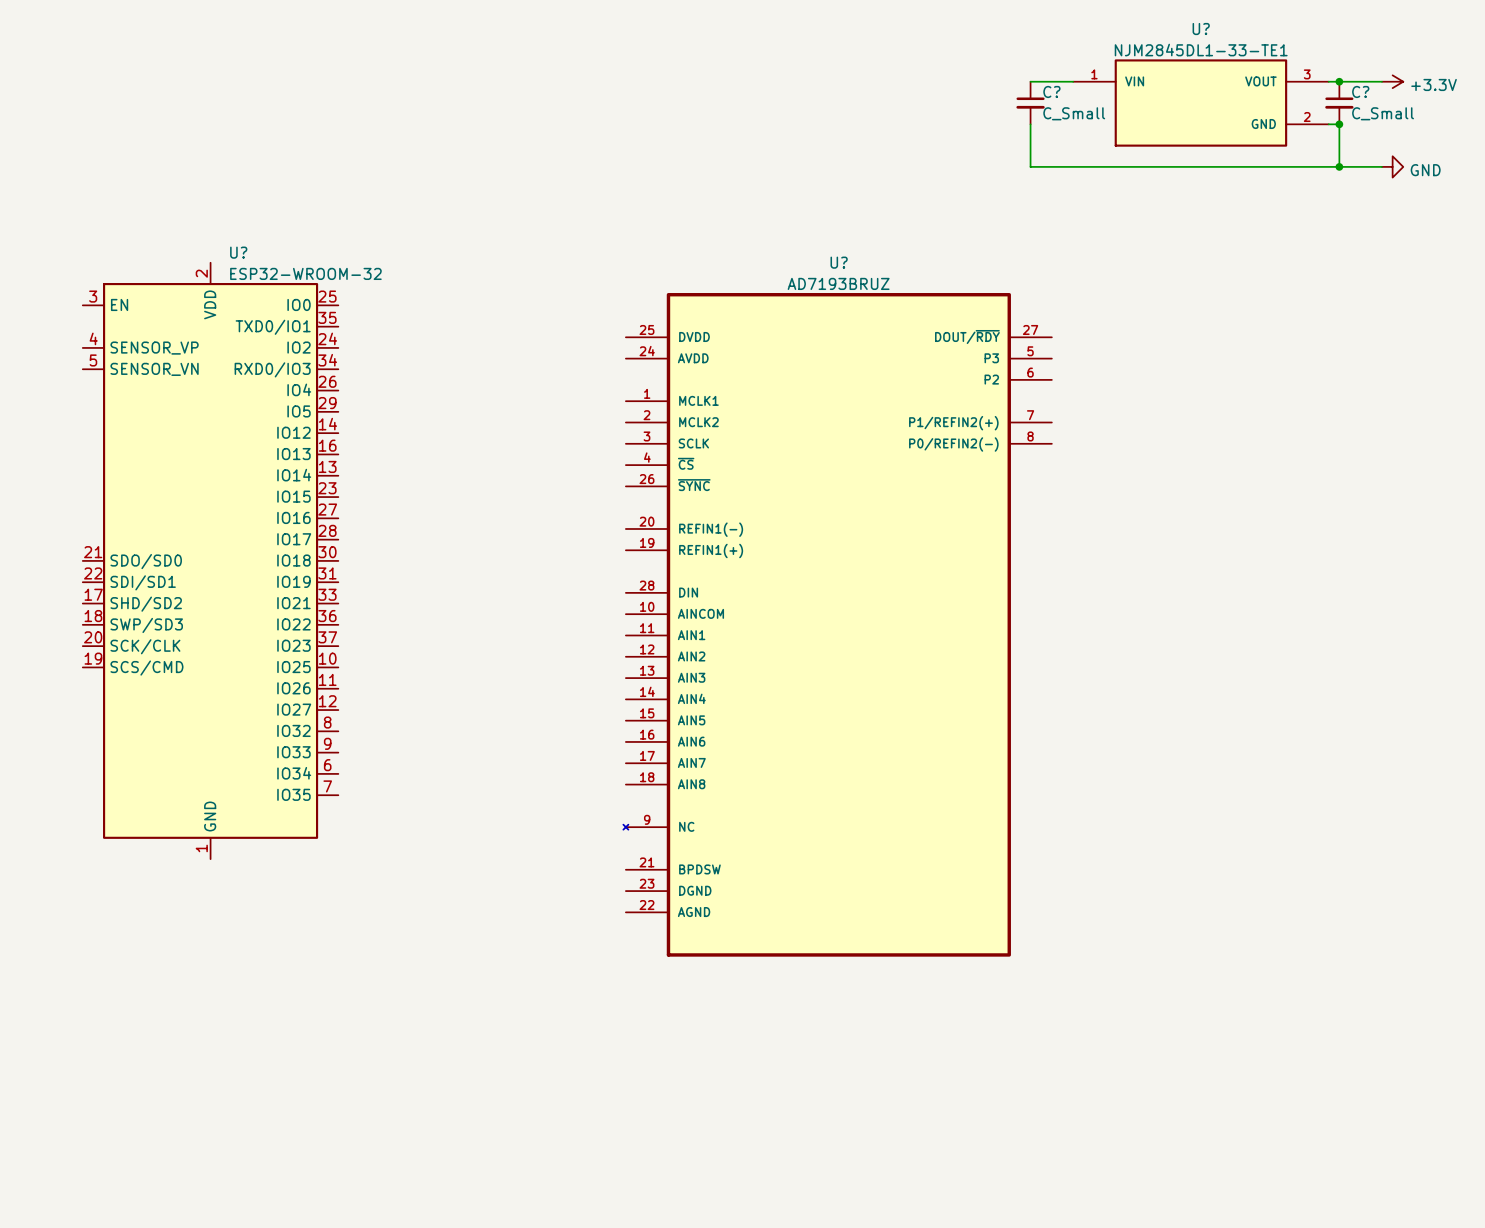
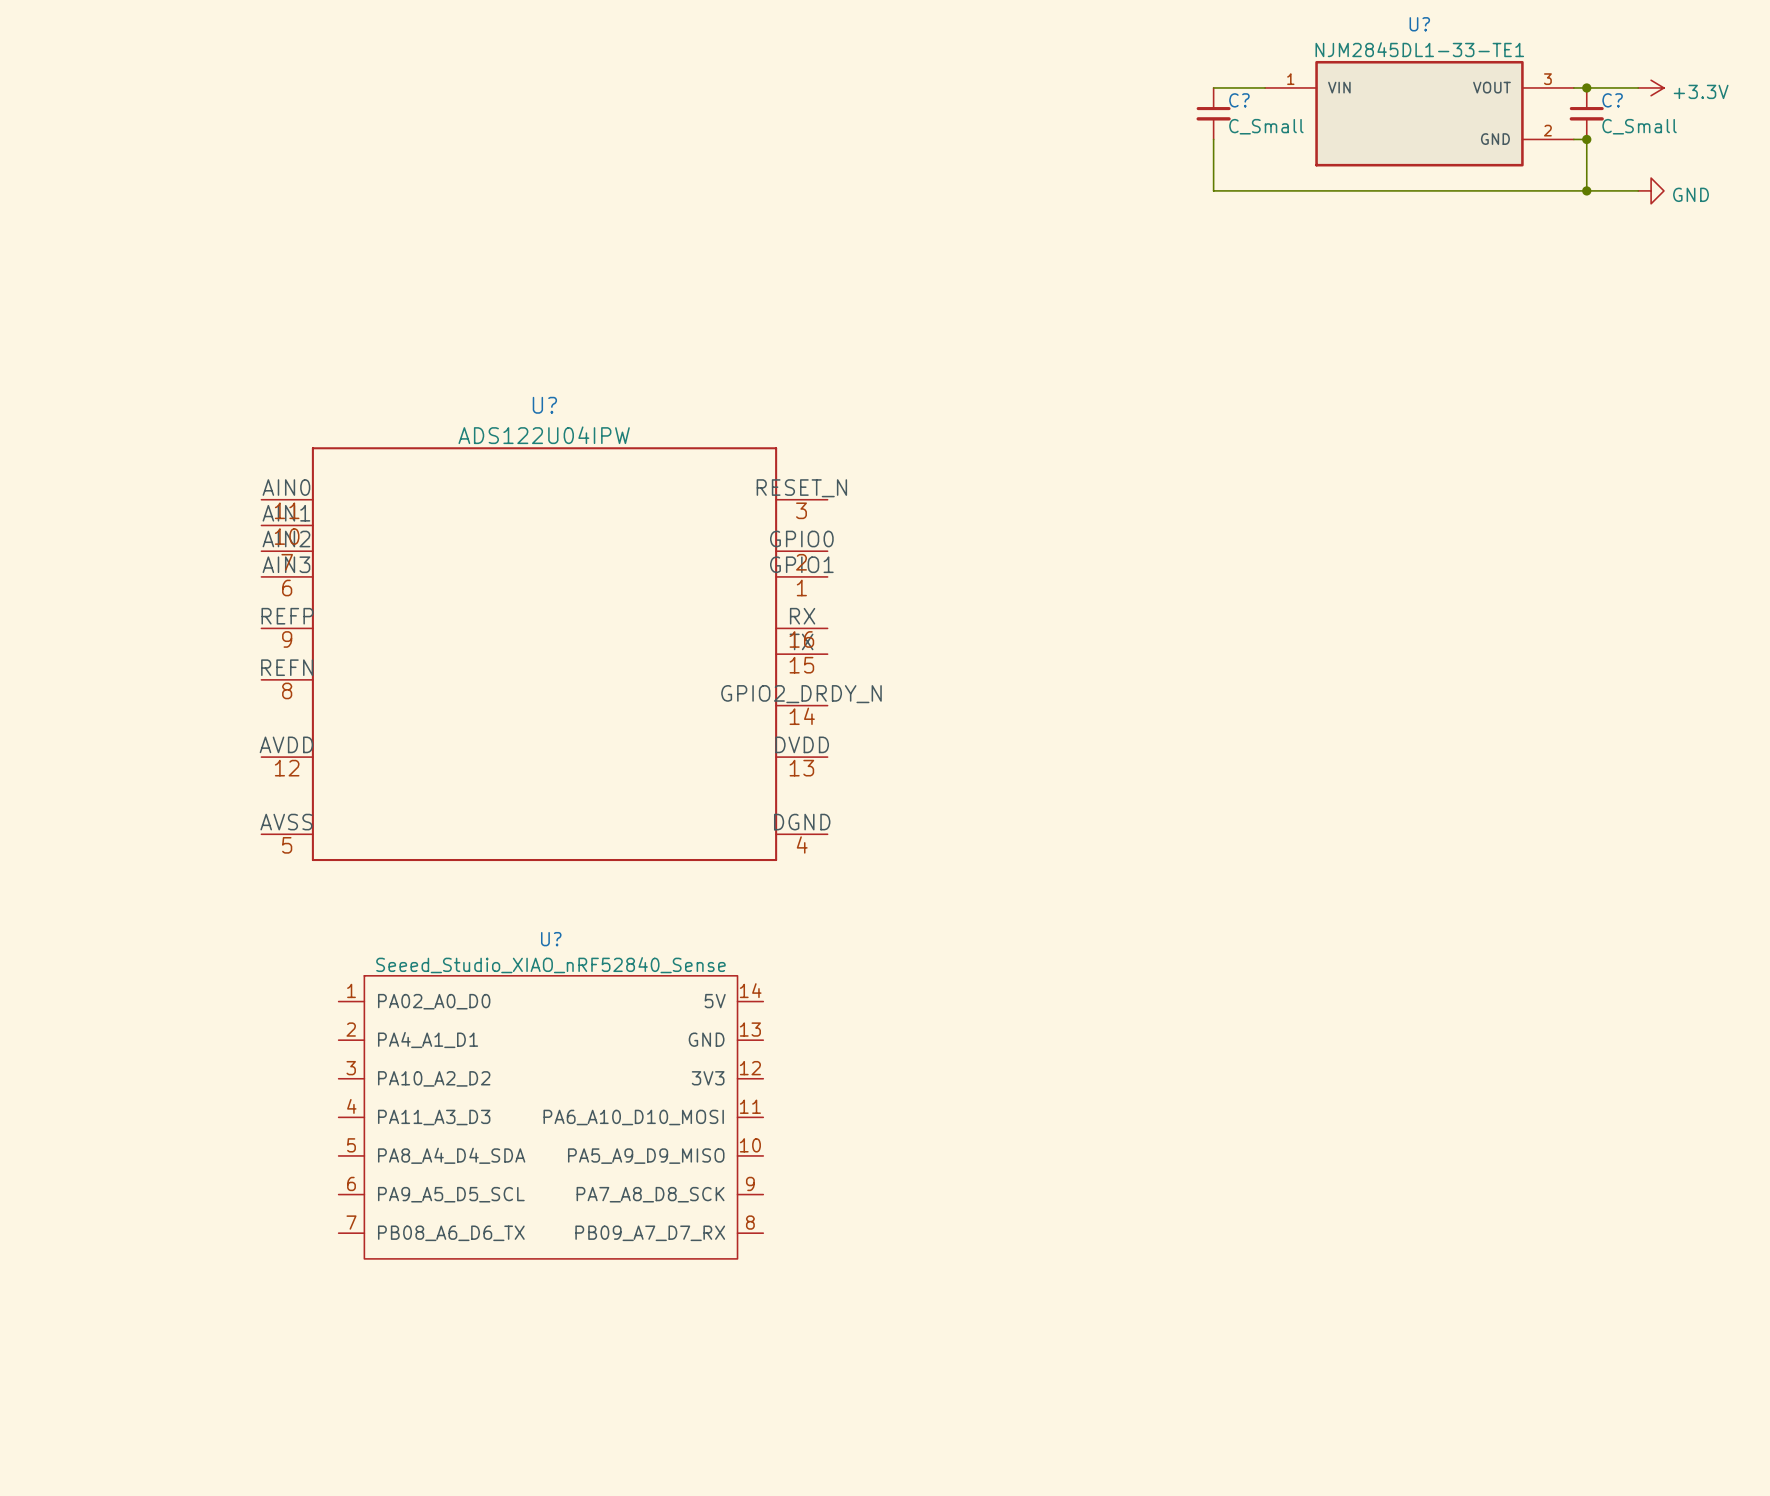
U?: none -> ADS122U04IPW (544, 654)
U?: ESP32-WROOM-32 (210, 560) -> none
U?: AD7193BRUZ (837, 624) -> none
U?: none -> Seeed_Studio_XIAO_nRF52840_Sense (550, 1117)

